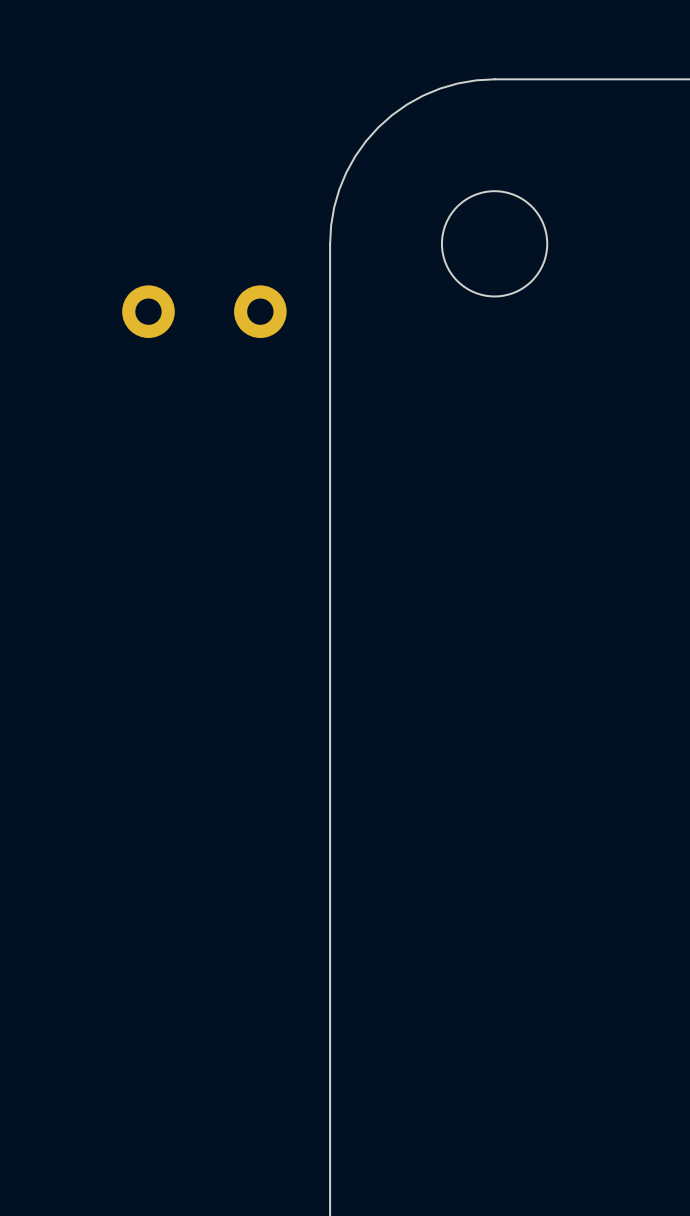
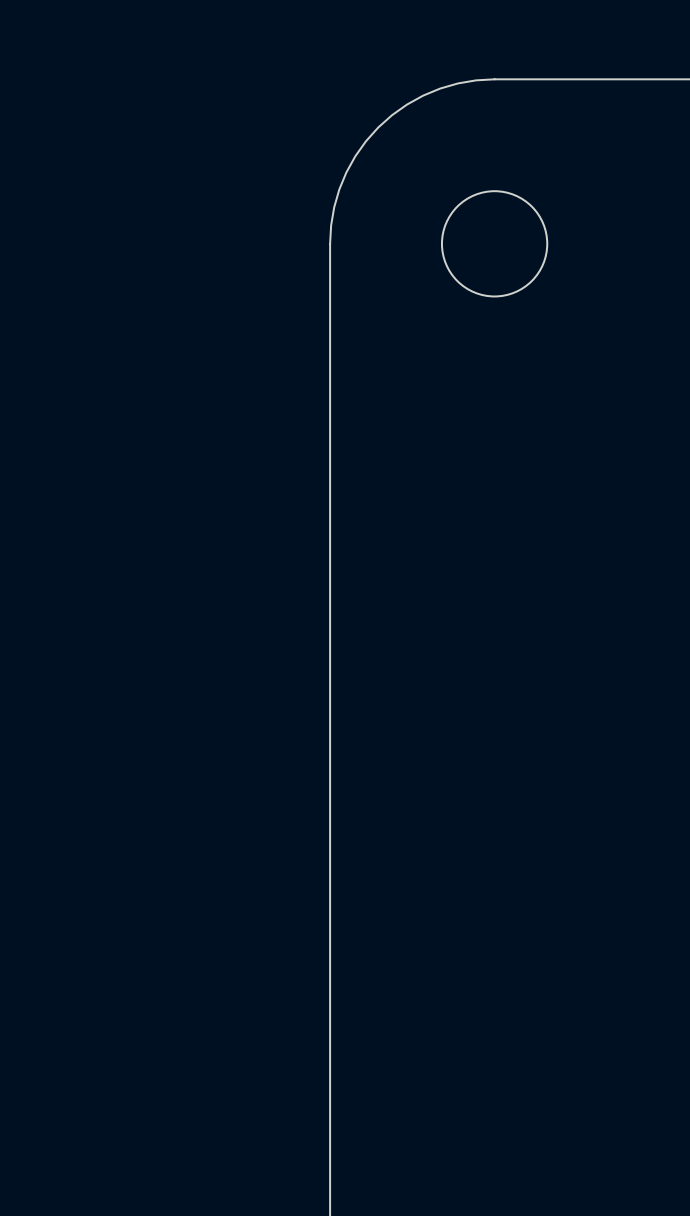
part: (204, 311) -> none

